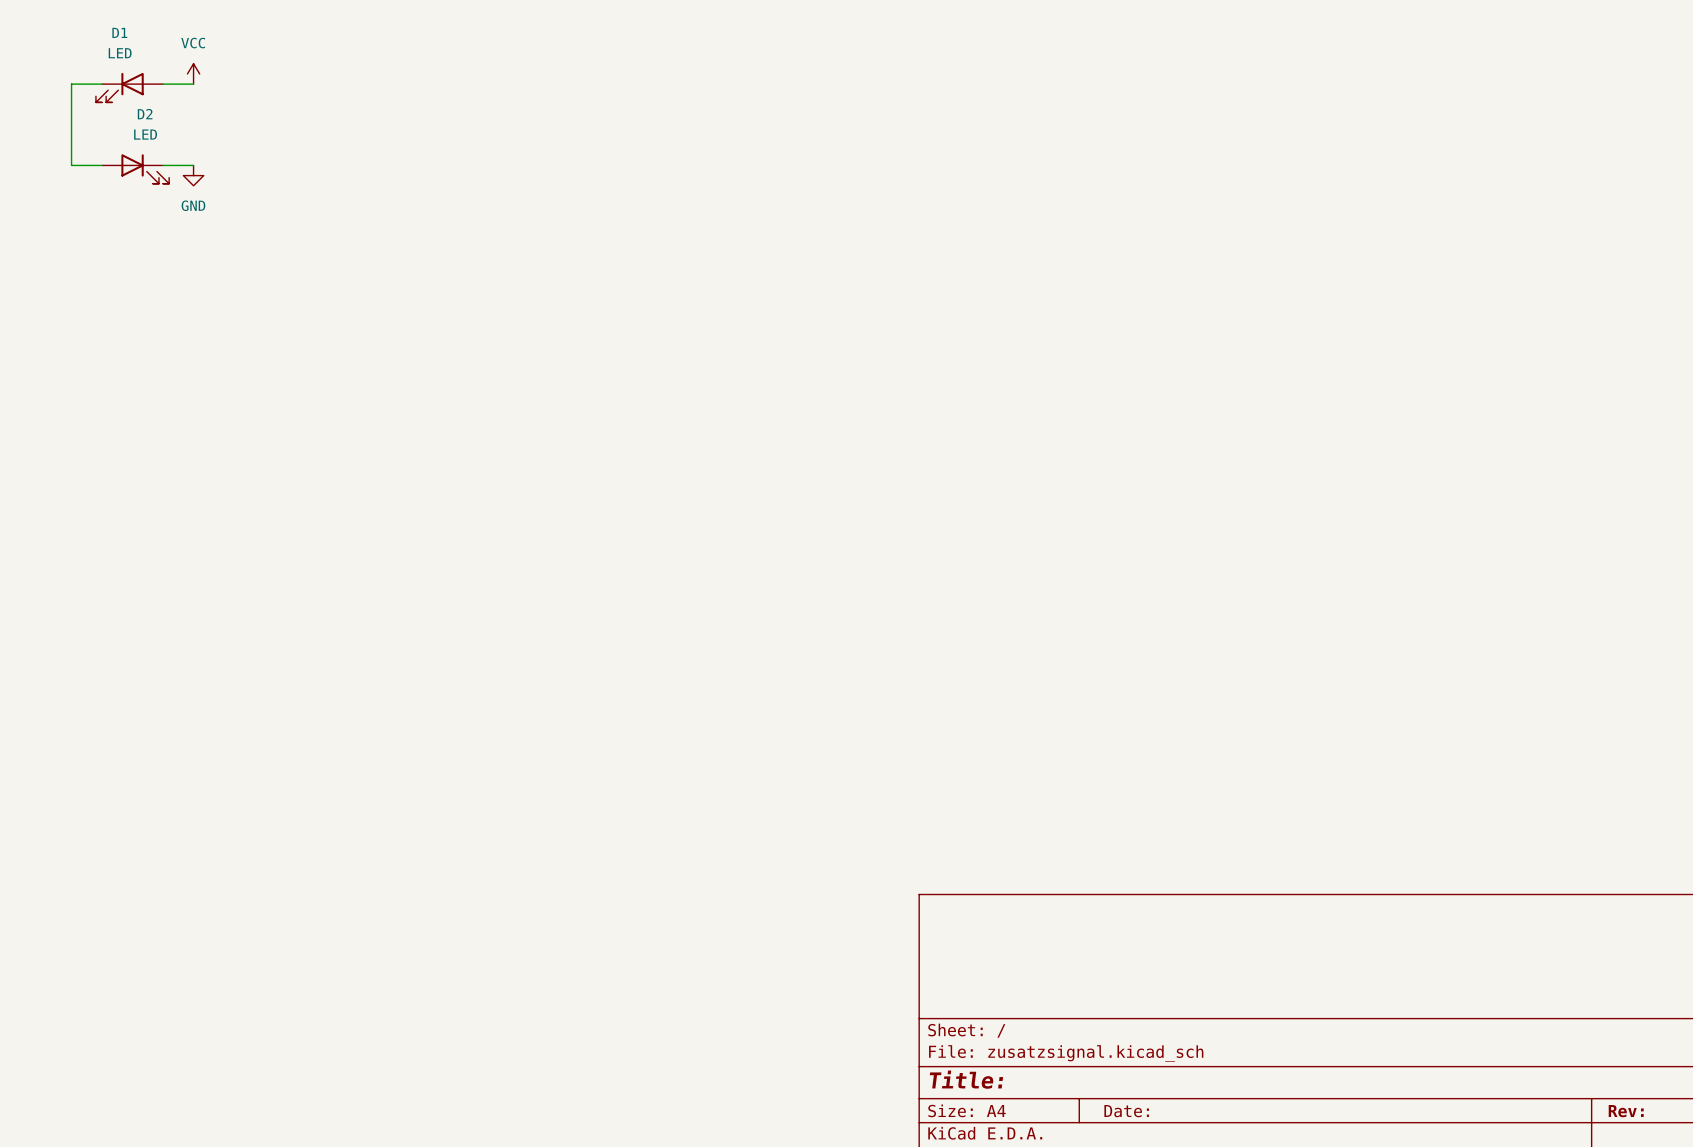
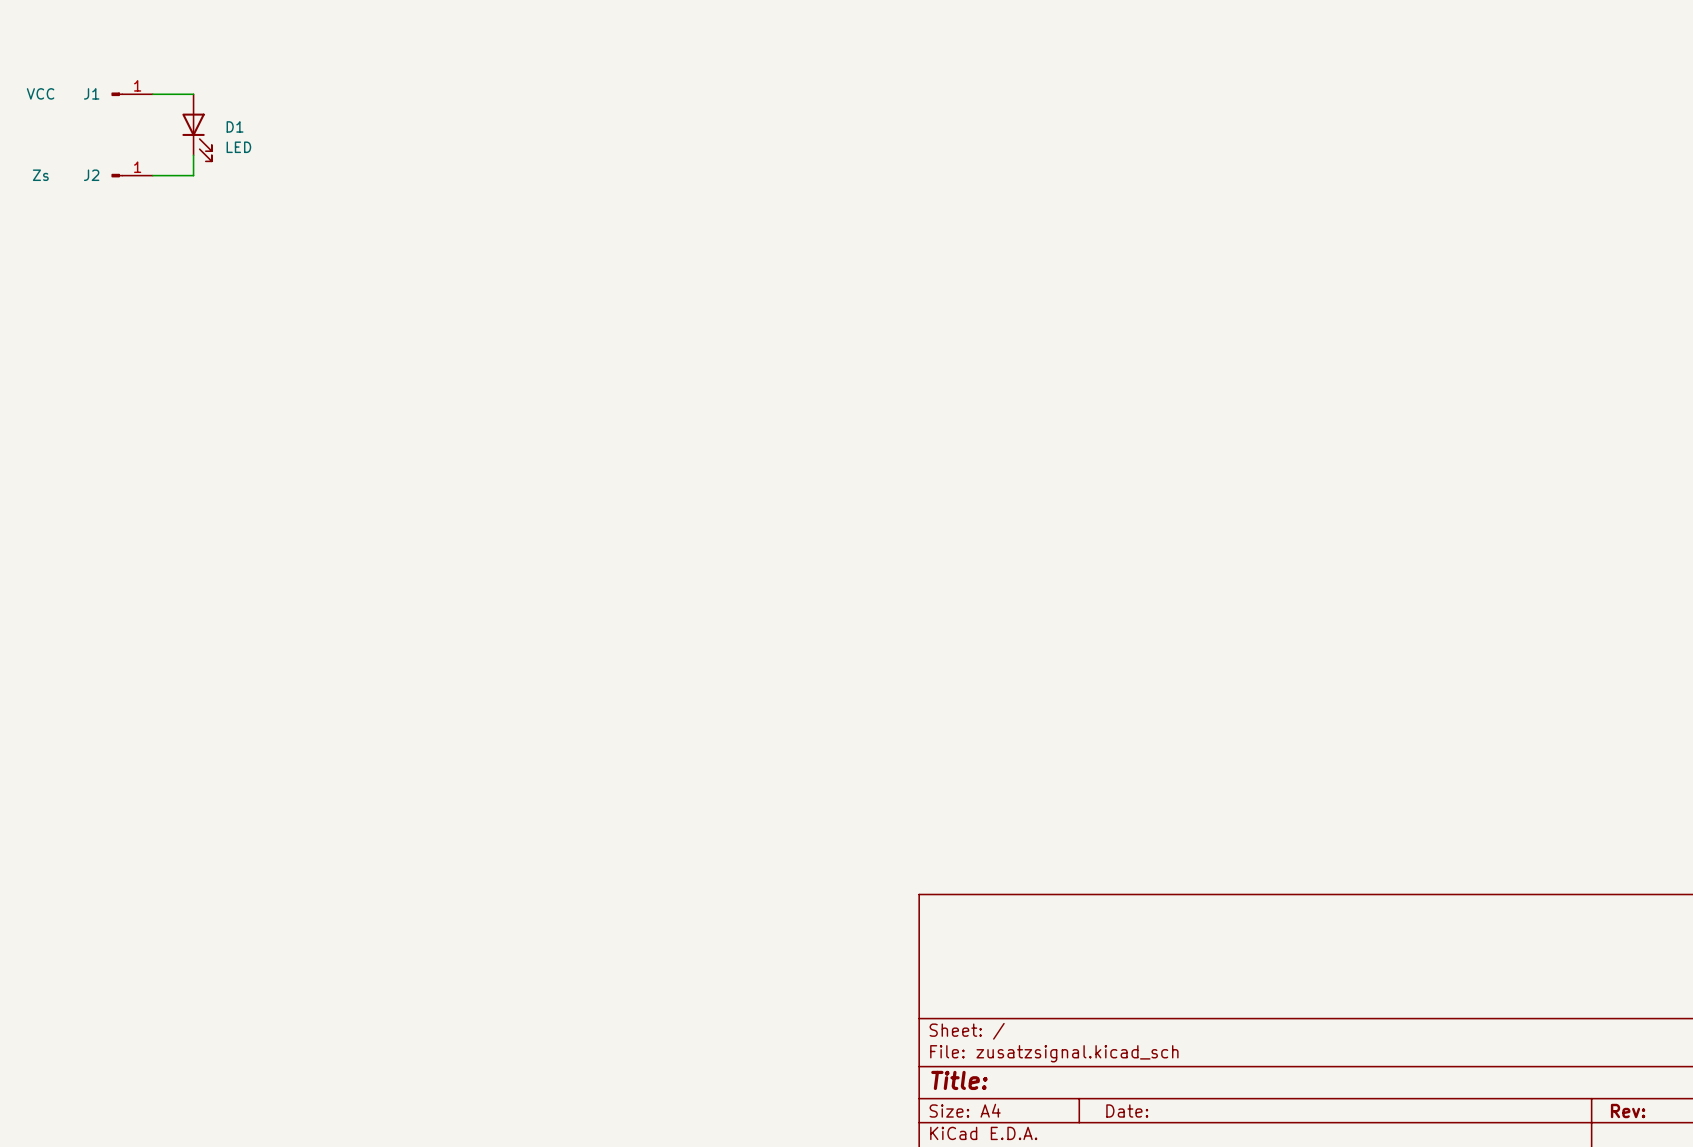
D1 name position: D1 (119, 32) -> D1 (235, 126)
D1 value position: LED (120, 53) -> LED (238, 147)
power symbol: VCC (193, 73) -> none
wire: (102, 84) (71, 84) (71, 165) (102, 165) -> none
wire: (163, 84) (193, 84) -> none
D1 rotation: 0° (119, 87) -> 90° counterclockwise (197, 137)
D1 position: (129, 87) -> (197, 127)
J1: none -> VCC (132, 94)
wire: none -> (152, 94) (193, 94)
wire: none -> (193, 155) (193, 175) (152, 175)
wire: (163, 165) (193, 165) -> none
D2: LED (135, 169) -> none
J2: none -> Zs (132, 175)
power symbol: GND (193, 175) -> none

